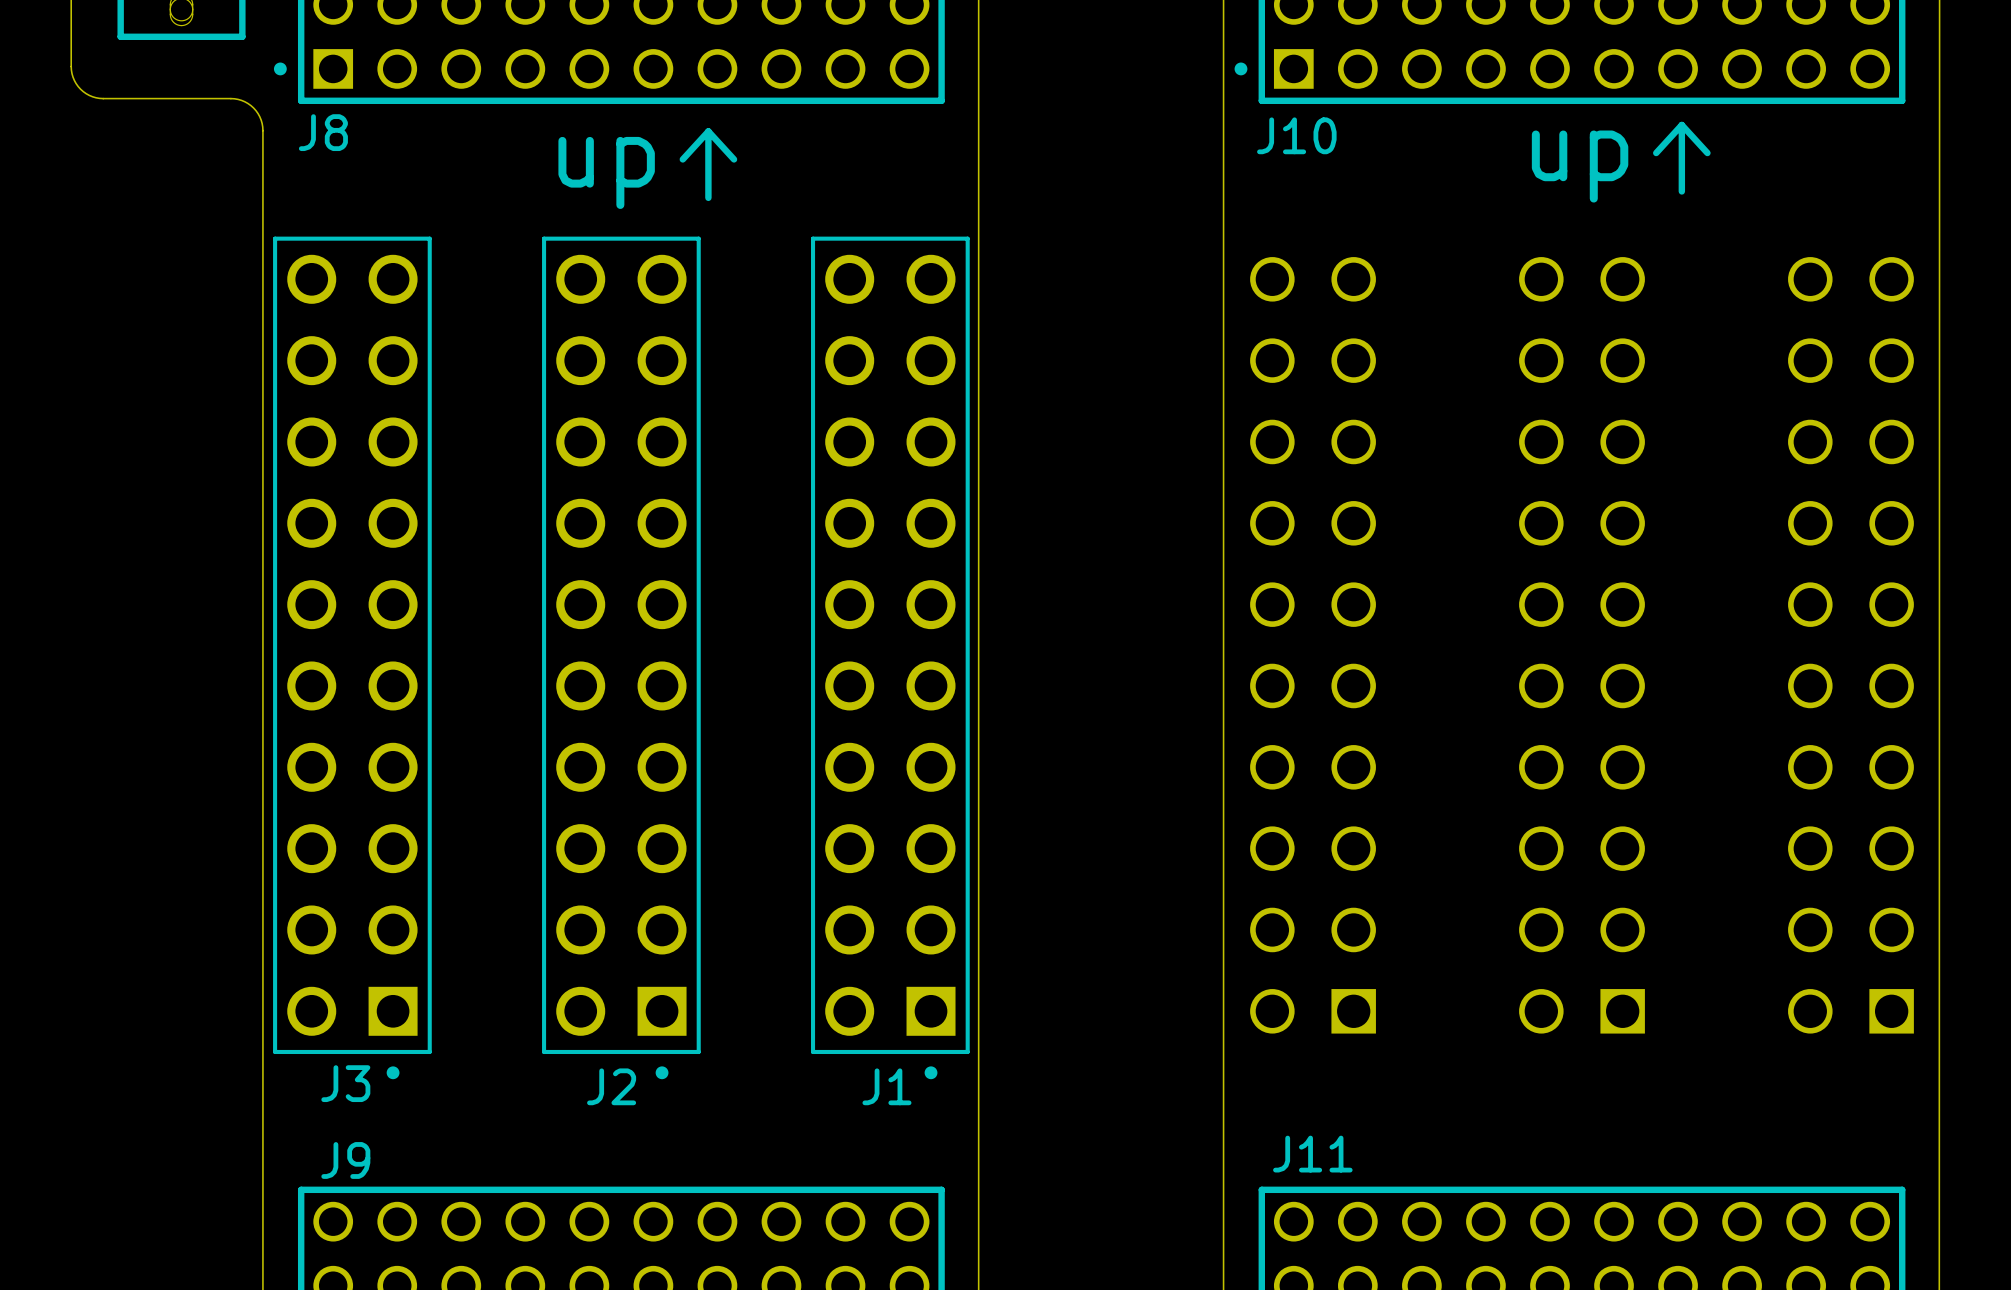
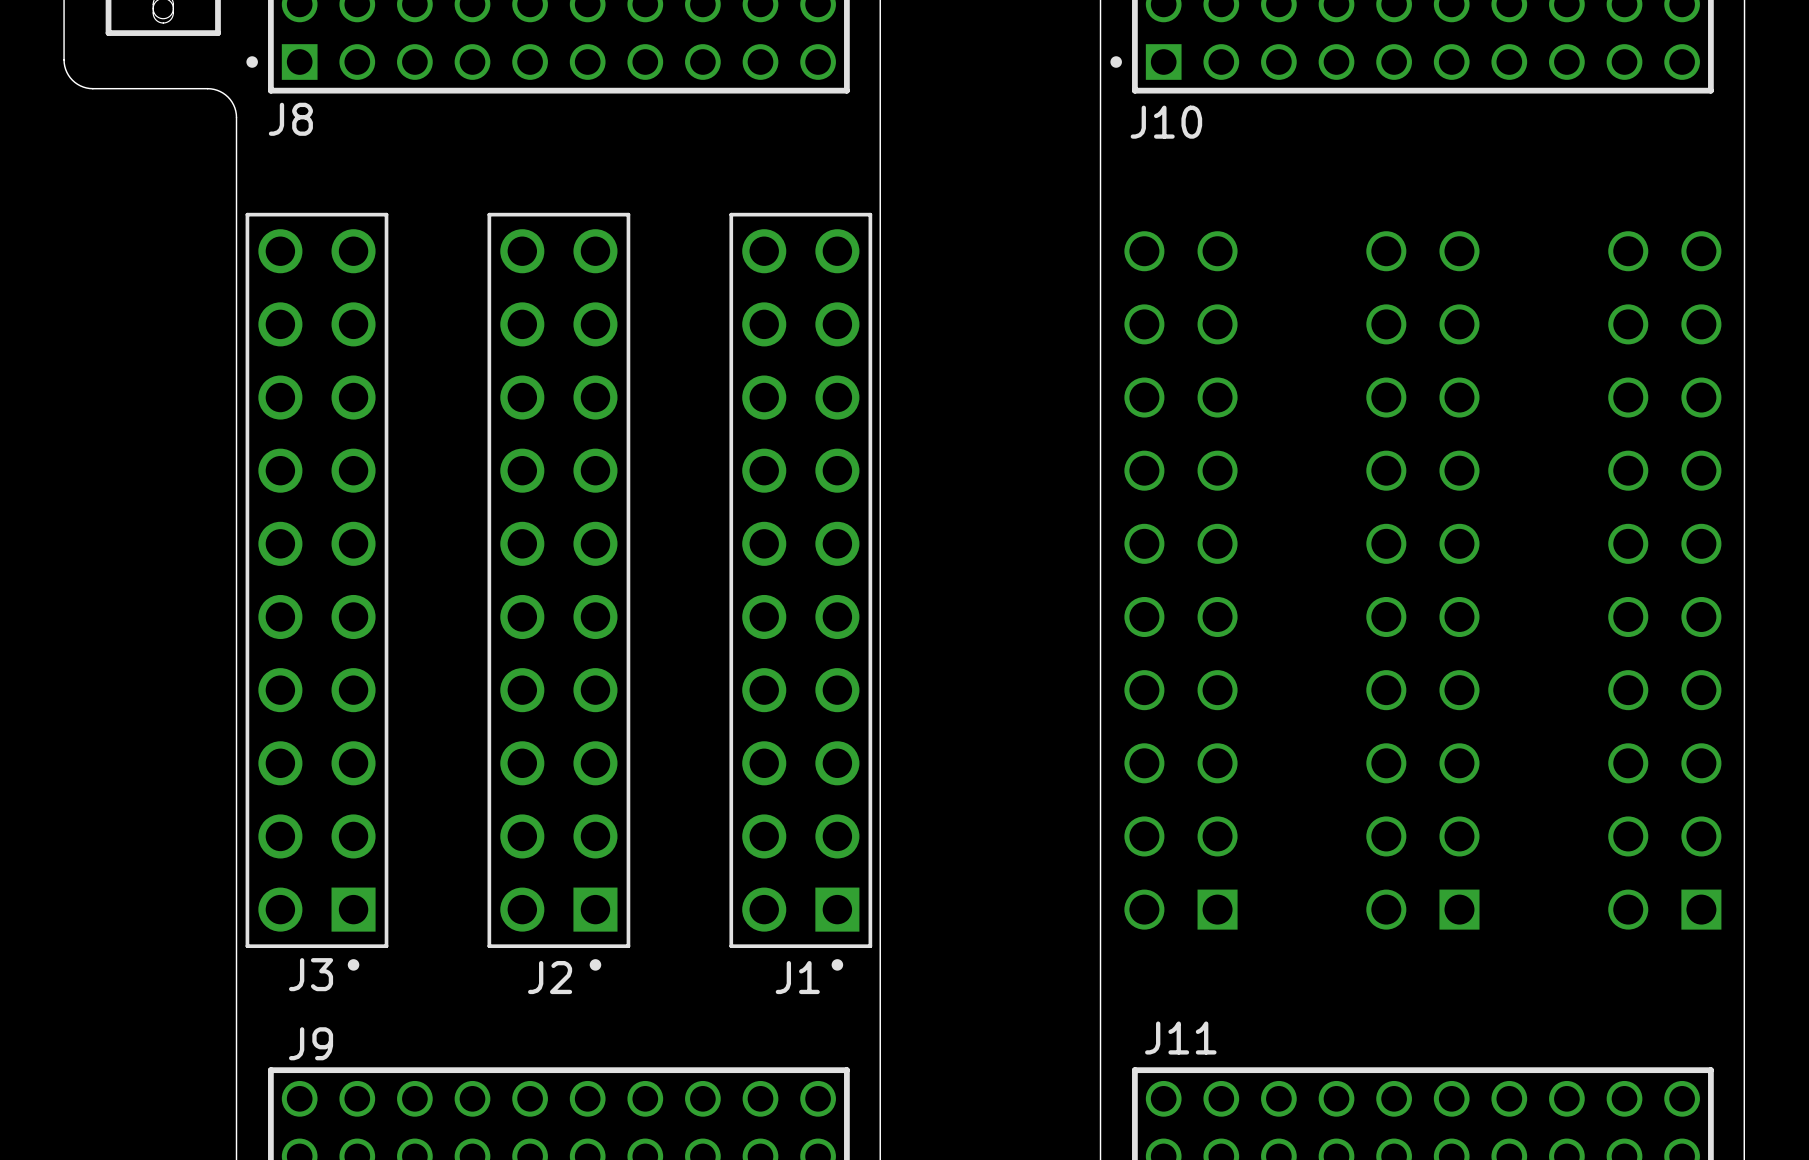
line: (1681, 125) (1681, 191) -> none
line: (1681, 125) (1656, 153) -> none
line: (1681, 125) (1707, 153) -> none
line: (708, 131) (682, 159) -> none
line: (708, 131) (734, 159) -> none
line: (708, 131) (708, 197) -> none
text: up (1580, 166) -> none
text: up (606, 172) -> none

